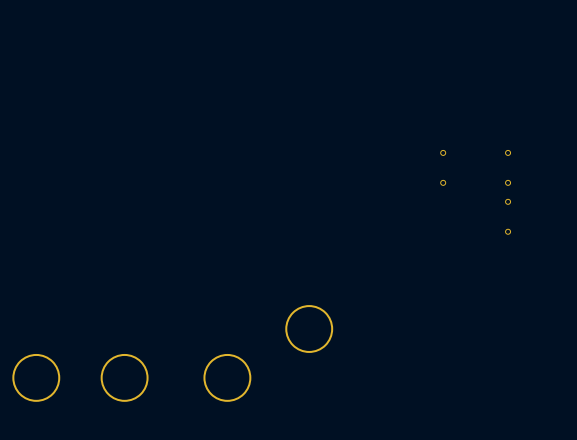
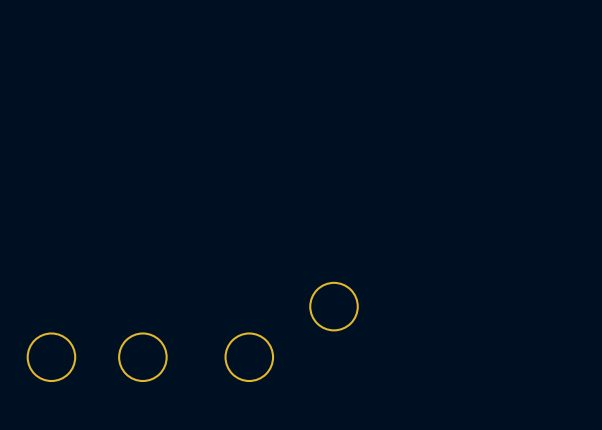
part: (443, 167) -> none
part: (508, 167) -> none
part: (508, 216) -> none

